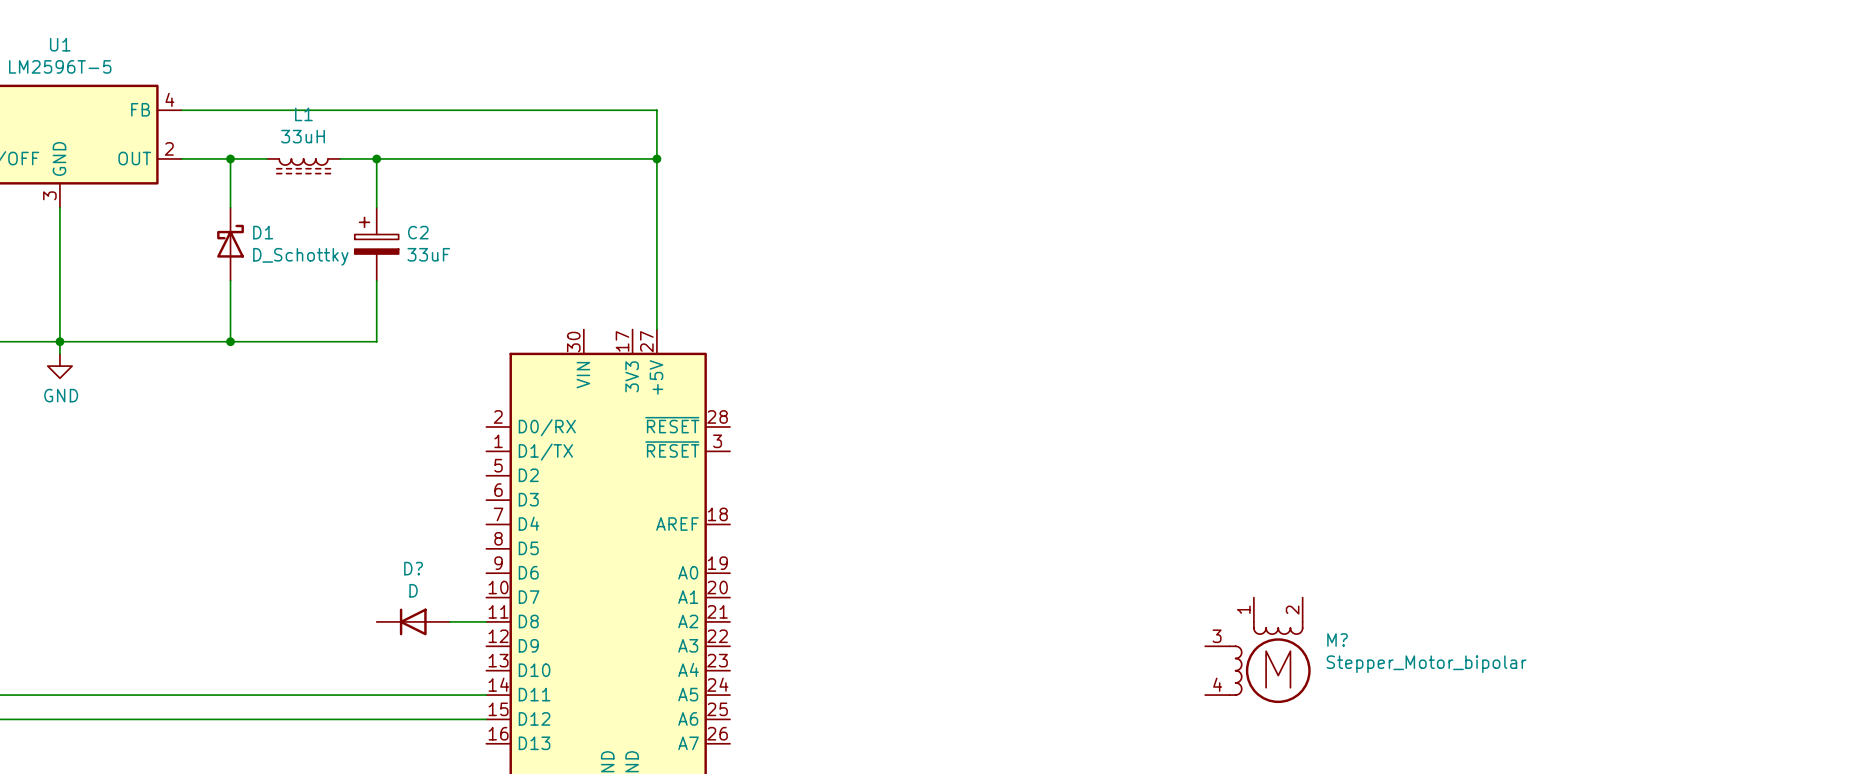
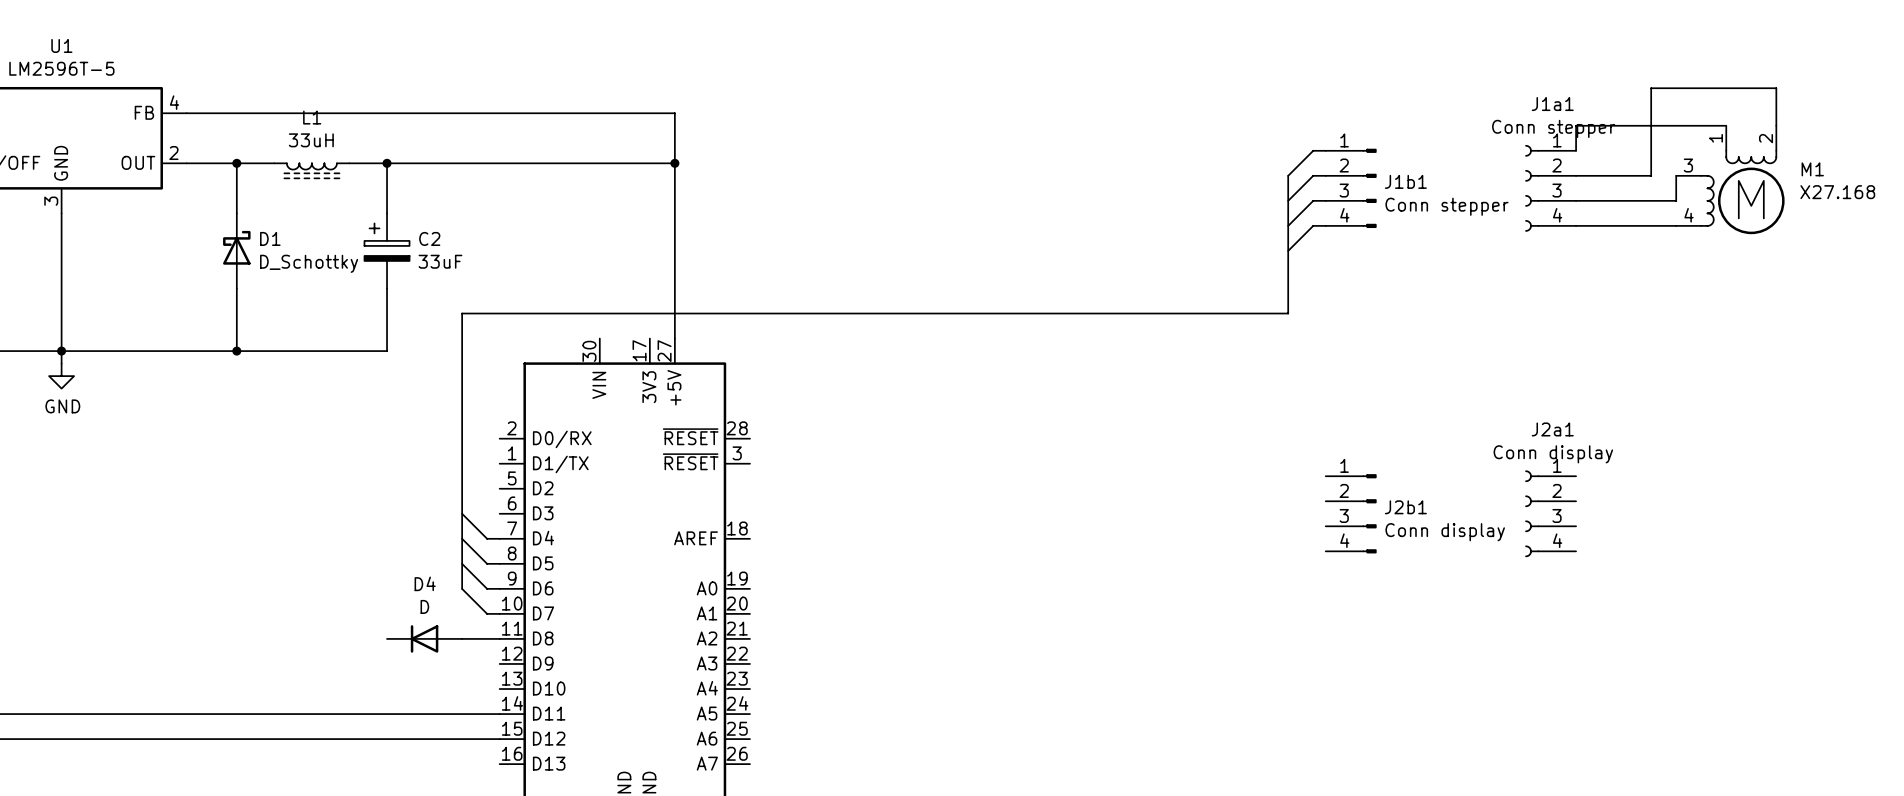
wire: none -> (1726, 125) (1576, 125) (1576, 150)
wire: none -> (1776, 125) (1776, 88) (1651, 88) (1651, 175) (1576, 175)
wire: none -> (1325, 150) (1313, 150) (1288, 175)
bus: none -> (1288, 175) (1288, 313) (462, 313) (462, 588)
wire: none -> (1325, 175) (1313, 175) (1288, 200)
wire: none -> (1676, 175) (1676, 200) (1576, 200)
M1: none -> X27.168 (1730, 179)
J1b1: none -> Conn stepper (1351, 188)
J1a1: none -> Conn stepper (1550, 188)
wire: none -> (1325, 200) (1313, 200) (1288, 225)
wire: none -> (1325, 225) (1313, 225) (1288, 250)
wire: none -> (1576, 225) (1676, 225)
wire: none -> (462, 513) (487, 538) (499, 538)
J2b1: none -> Conn display (1351, 513)
J2a1: none -> Conn display (1550, 513)
wire: none -> (462, 538) (487, 563) (499, 563)
wire: none -> (462, 563) (487, 588) (499, 588)
D? name: D? (413, 568) -> D4 (425, 583)
wire: none -> (462, 588) (487, 613) (499, 613)
M?: Stepper_Motor_bipolar (1257, 650) -> none

